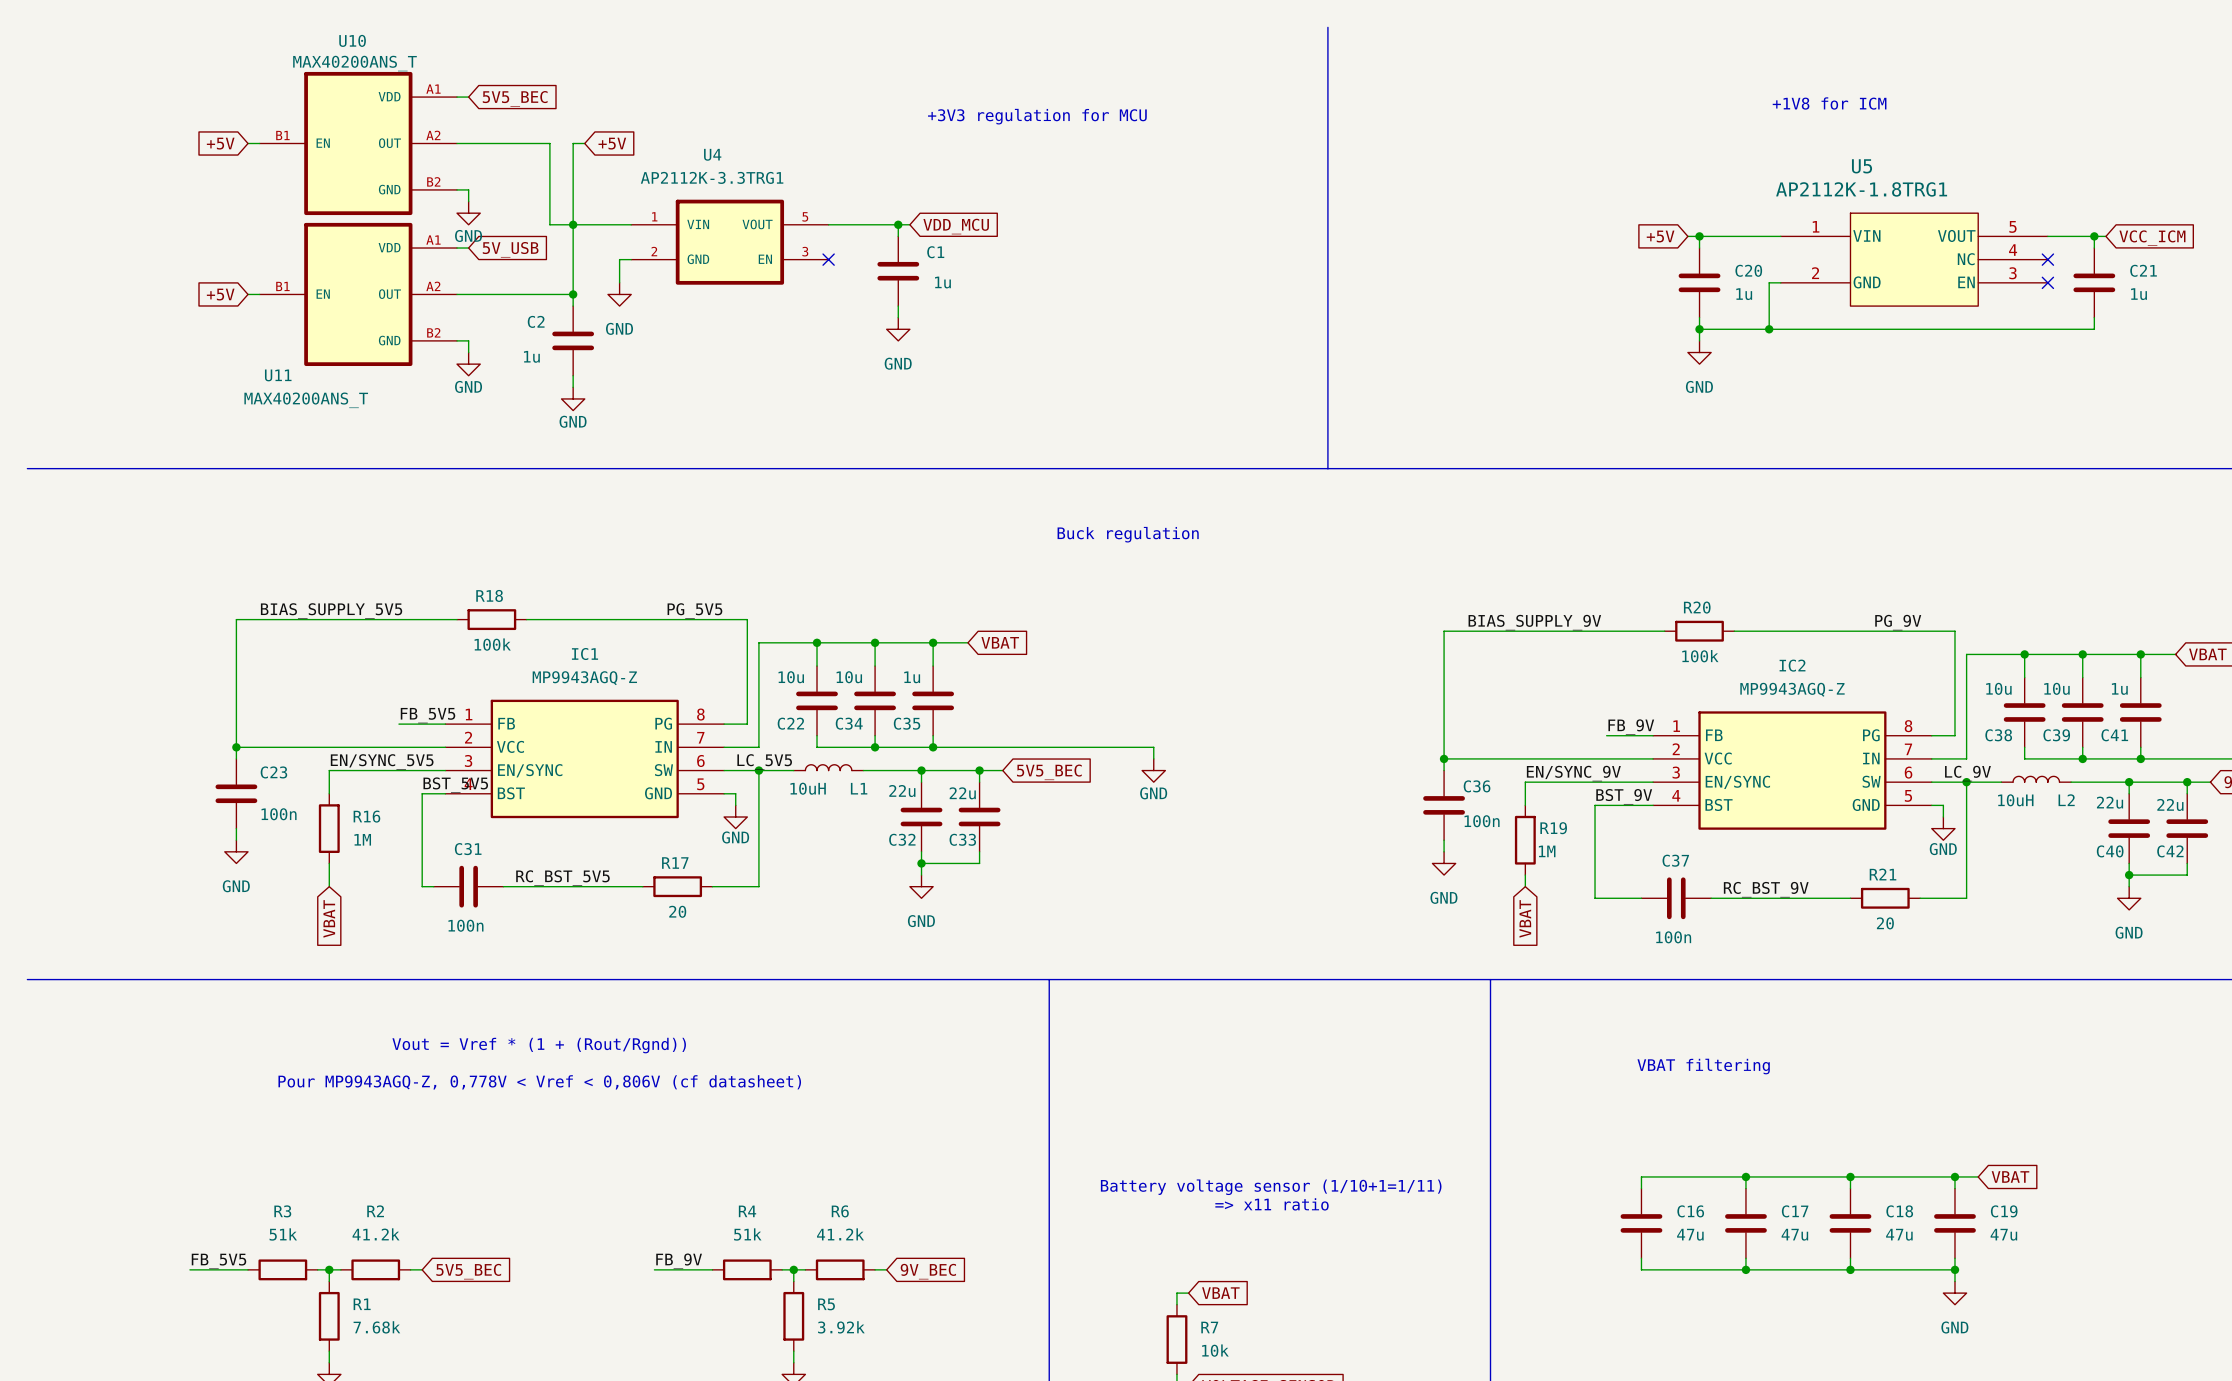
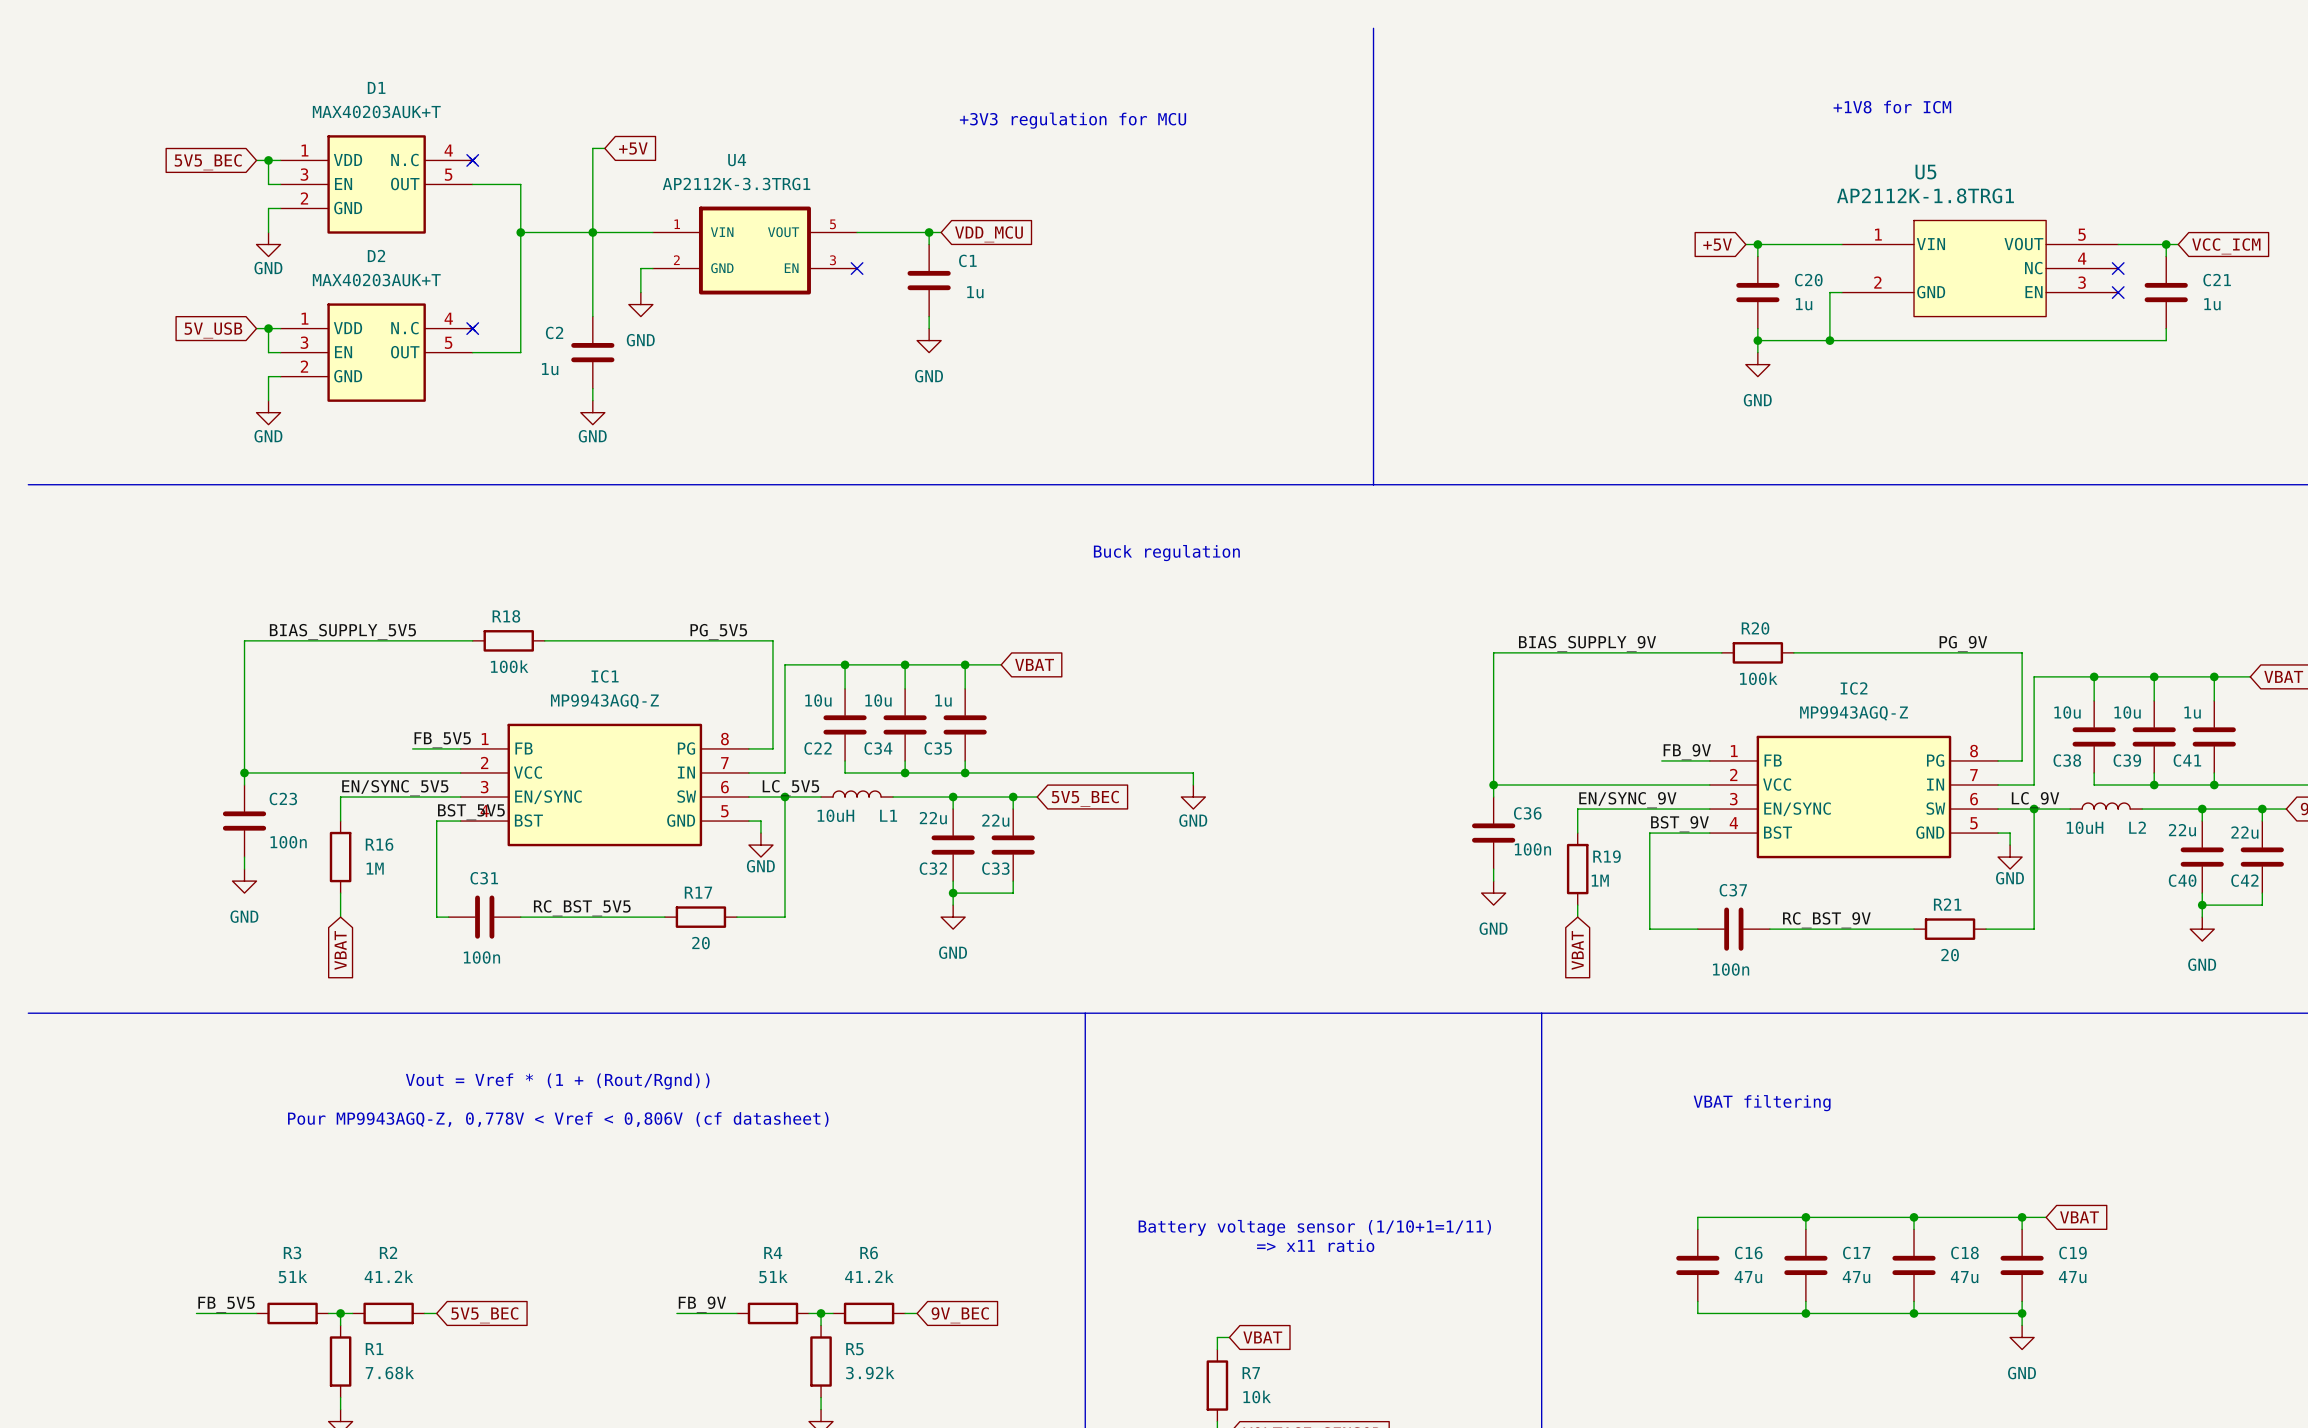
wire: (457, 97) (468, 97) -> none
global label rotation: 0° (515, 98) -> 180° (208, 162)
global label position: 5V5_BEC (515, 98) -> 5V5_BEC (208, 162)
global label: +5V (220, 143) -> none
wire: (248, 143) (259, 143) -> none
U10: MAX40200ANS_T (358, 143) -> none
wire: (457, 143) (549, 143) (549, 224) -> (520, 232) (568, 232)
wire: none -> (256, 160) (280, 160)
wire: none -> (268, 160) (268, 184) (280, 184)
junction: none -> (268, 160)
no-connect mark: none -> (472, 160)
D1: none -> MAX40203AUK+T (378, 184)
wire: (457, 189) (468, 189) (468, 201) -> none
wire: none -> (280, 208) (268, 208) (268, 232)
power symbol: GND (468, 213) -> none
junction: none -> (520, 232)
power symbol: none -> GND (268, 244)
wire: (457, 248) (468, 248) -> none
global label: 5V_USB (510, 249) -> none
global label: +5V (220, 294) -> none
wire: (248, 294) (259, 294) -> none
U11: MAX40200ANS_T (358, 294) -> none
wire: (457, 294) (573, 294) -> none
junction: (573, 294) -> none
wire: none -> (256, 328) (280, 328)
wire: none -> (268, 328) (268, 352) (280, 352)
junction: none -> (268, 328)
no-connect mark: none -> (472, 328)
global label: none -> 5V_USB (213, 330)
D2: none -> MAX40203AUK+T (378, 352)
wire: (468, 340) (468, 352) -> (484, 352) (520, 352) (520, 184) (472, 184)
wire: none -> (280, 376) (268, 376) (268, 400)
power symbol: GND (468, 364) -> none
power symbol: none -> GND (268, 412)

